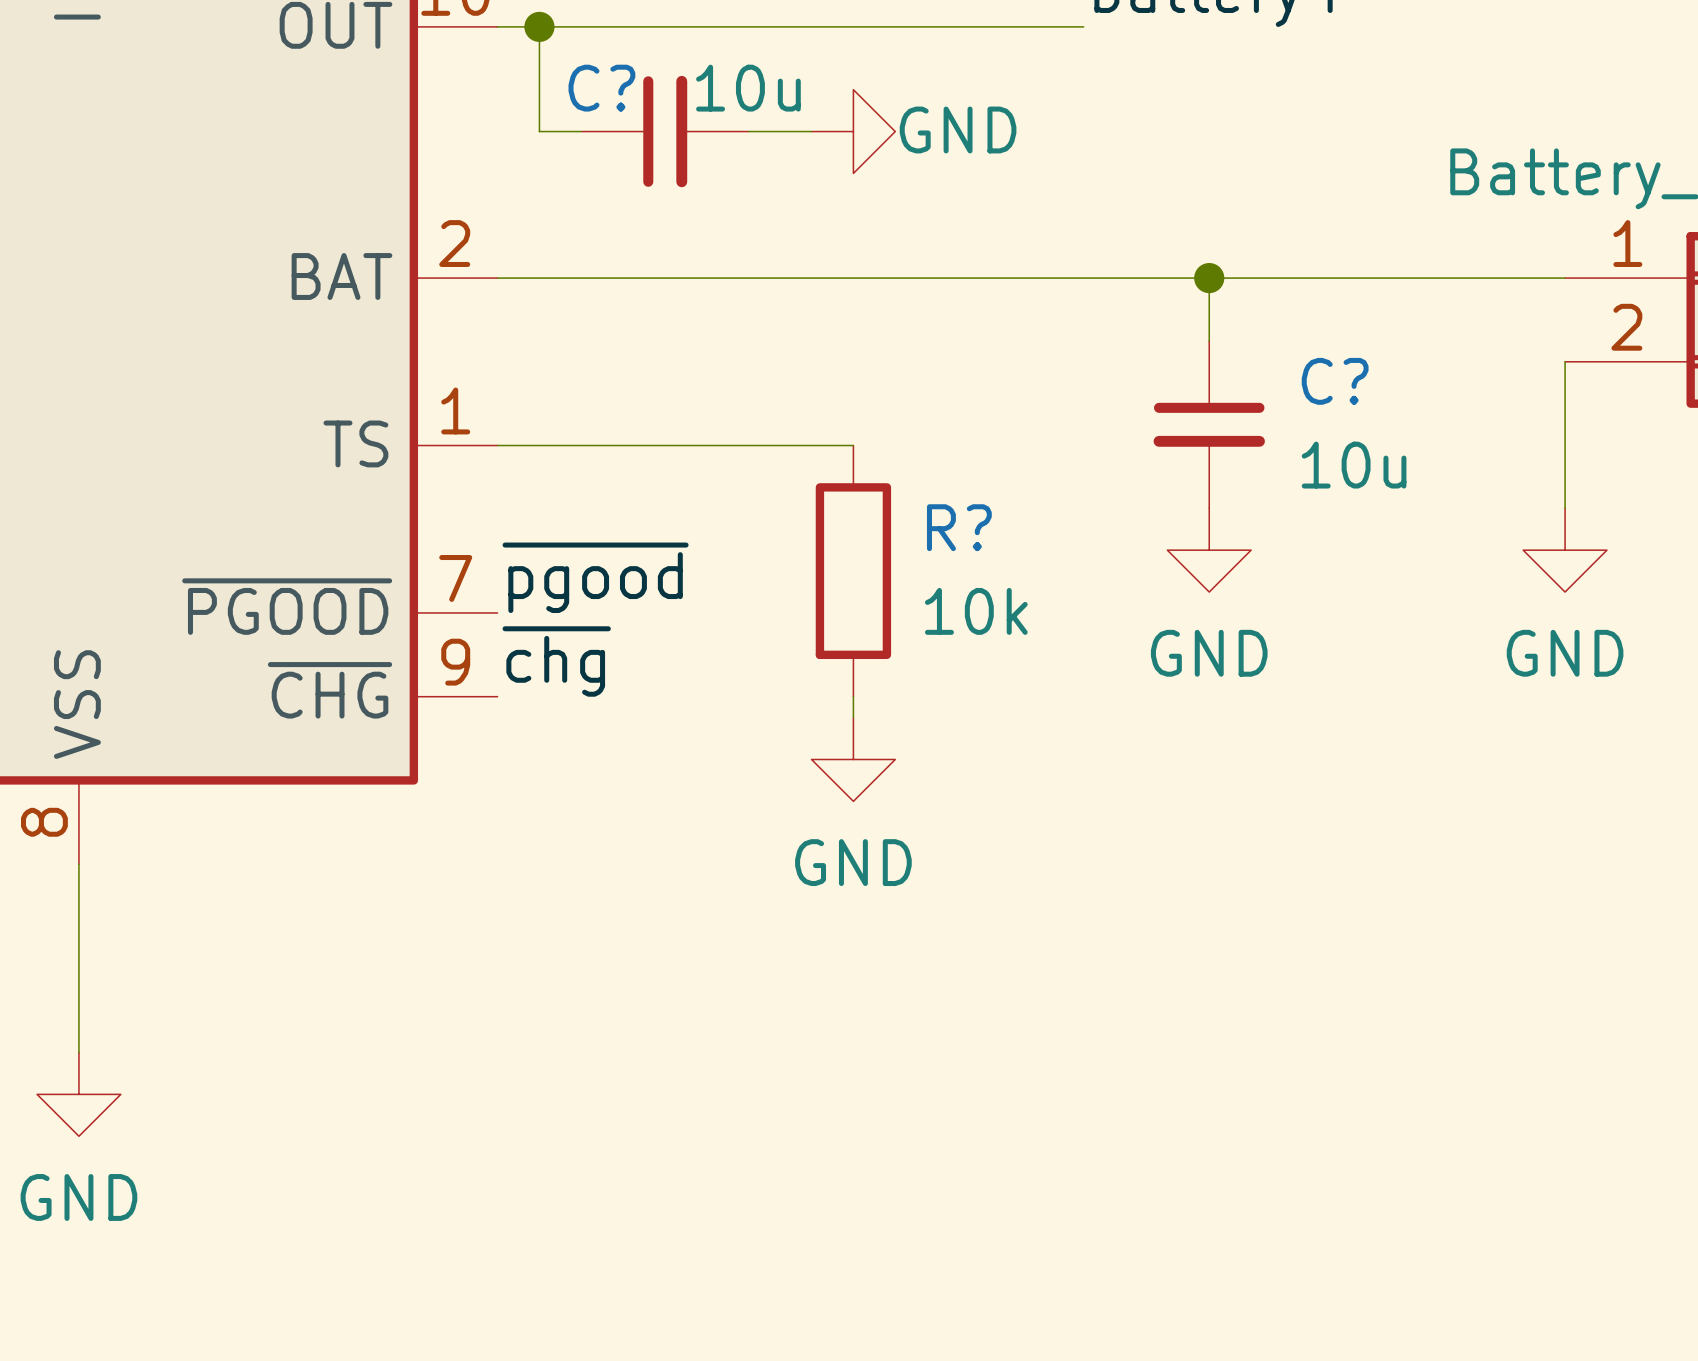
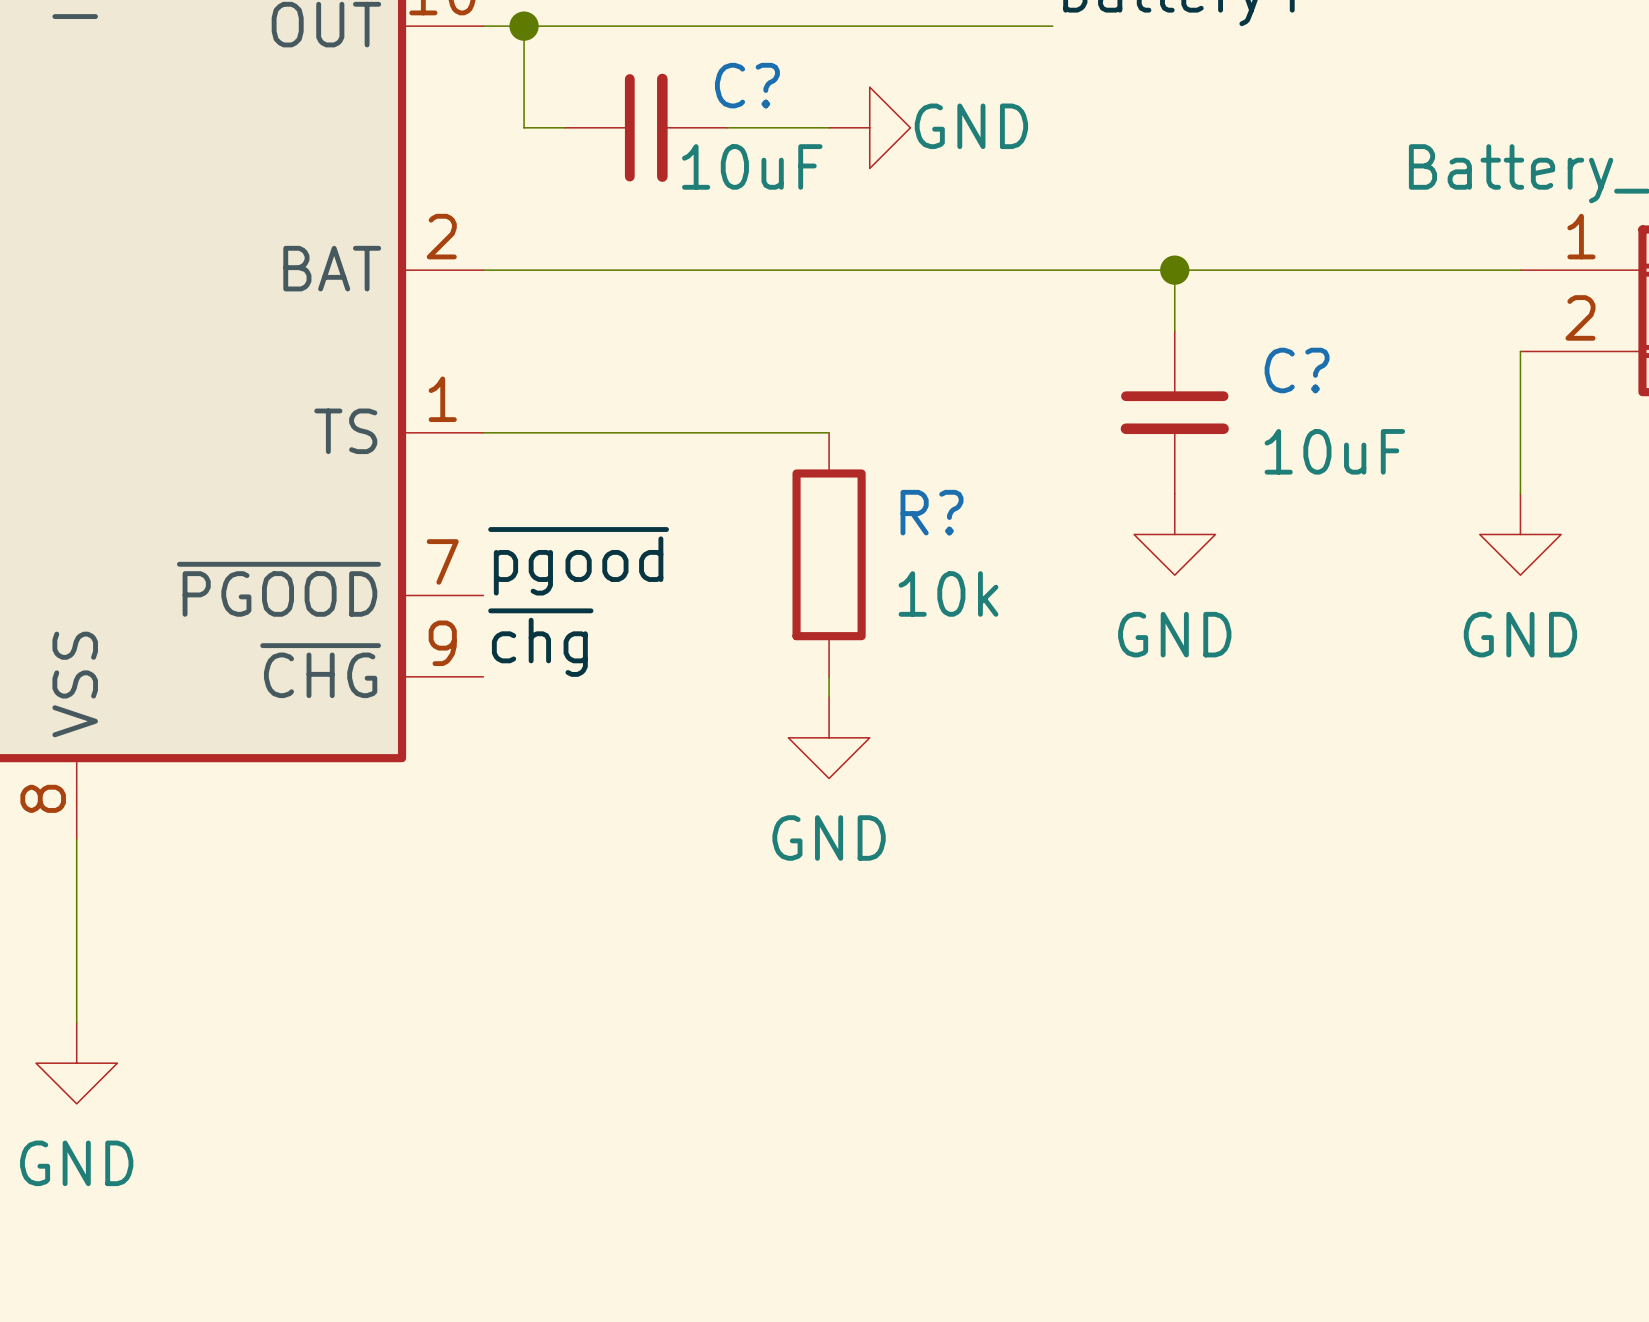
C? name position: C? (601, 88) -> C? (747, 85)
C? value: 10u (748, 88) -> 10uF (752, 166)
power symbol position: GND (853, 131) -> GND (869, 127)
C? value: 10u (1354, 465) -> 10uF (1334, 451)

